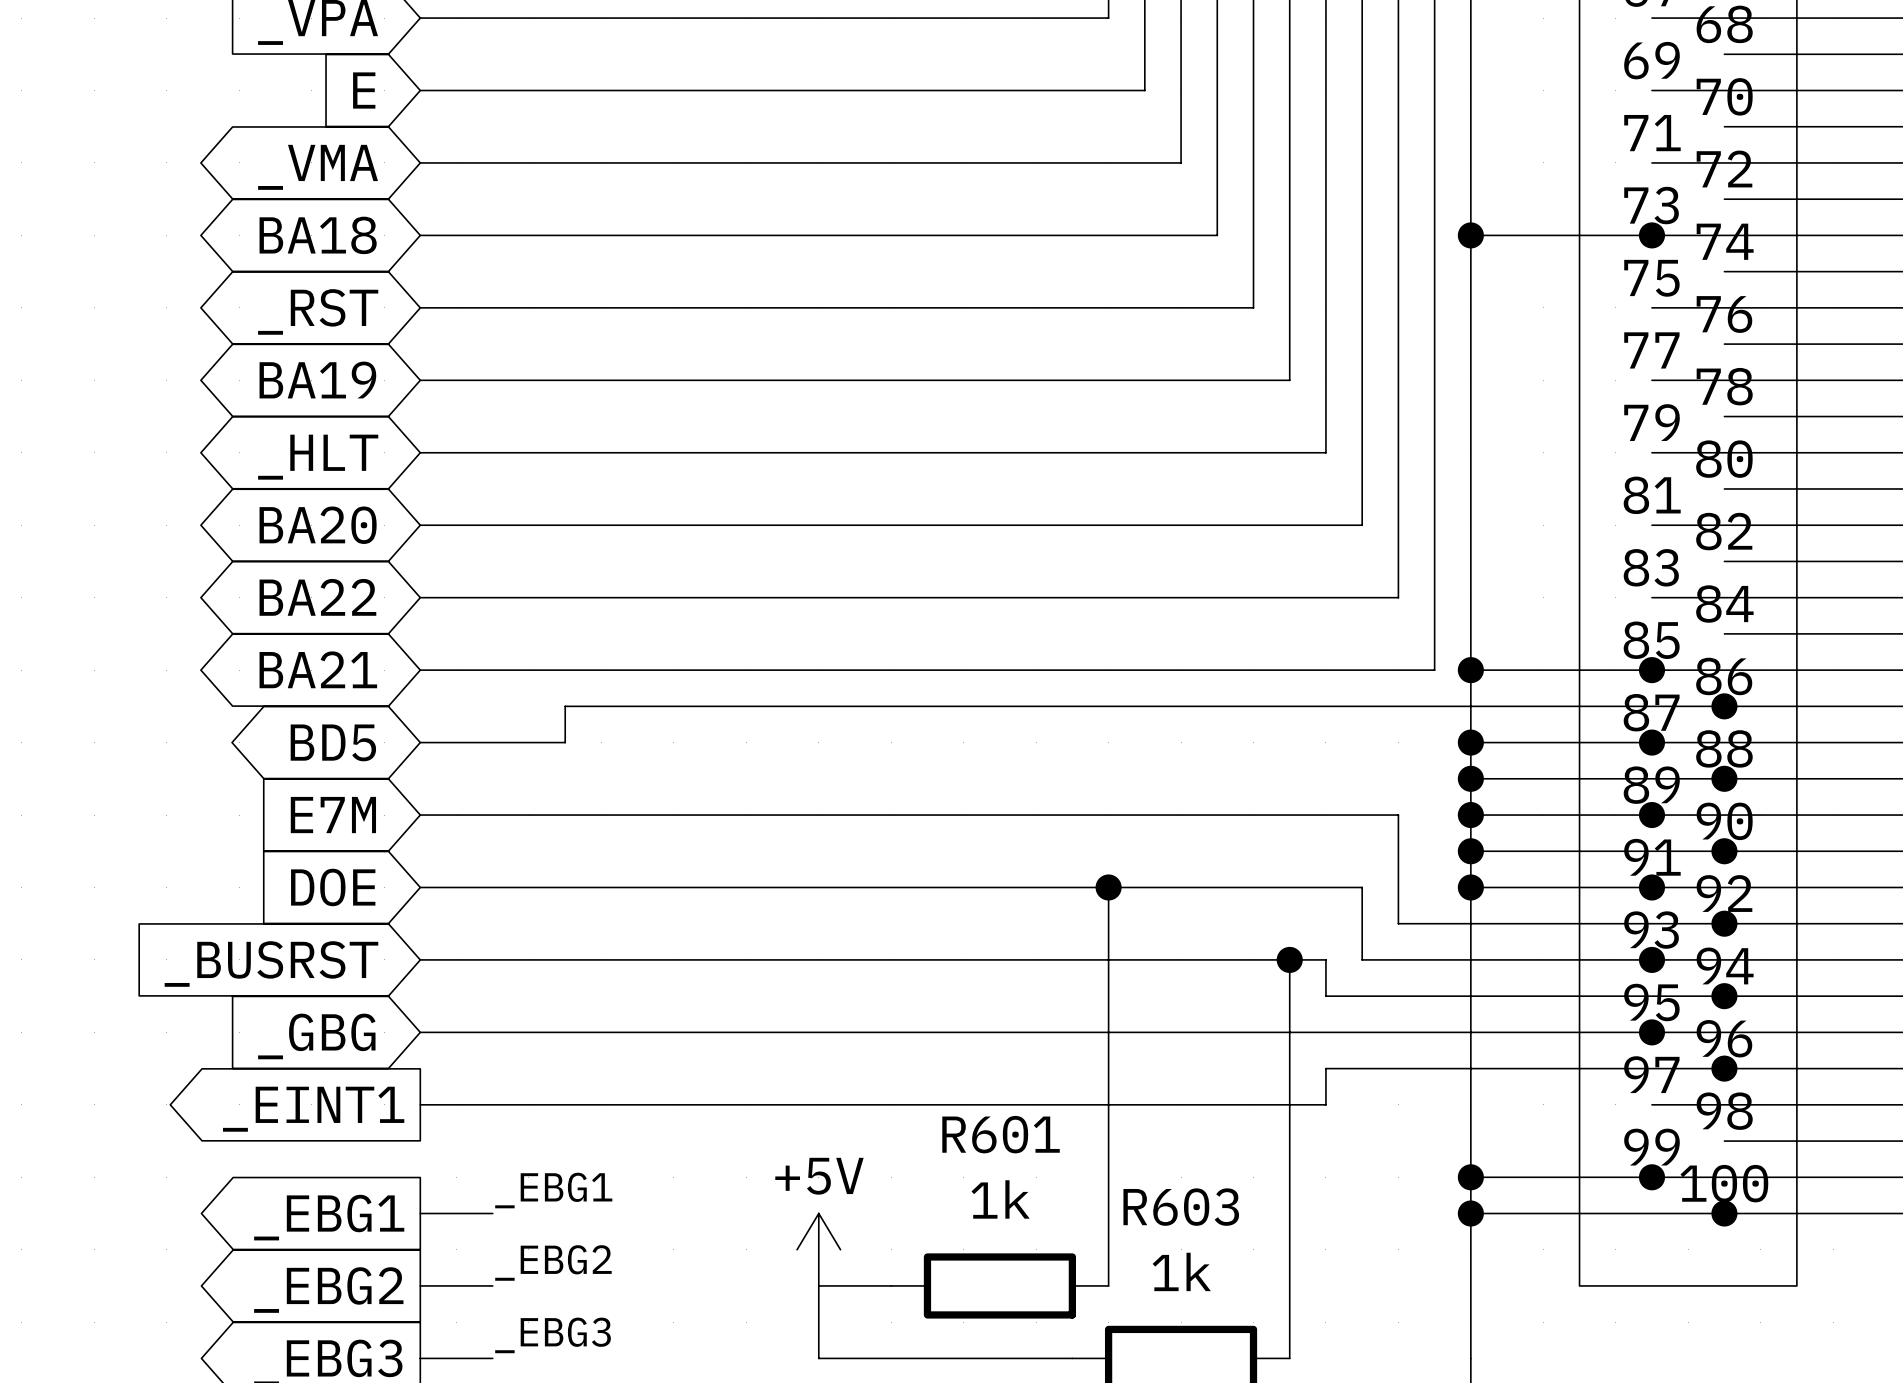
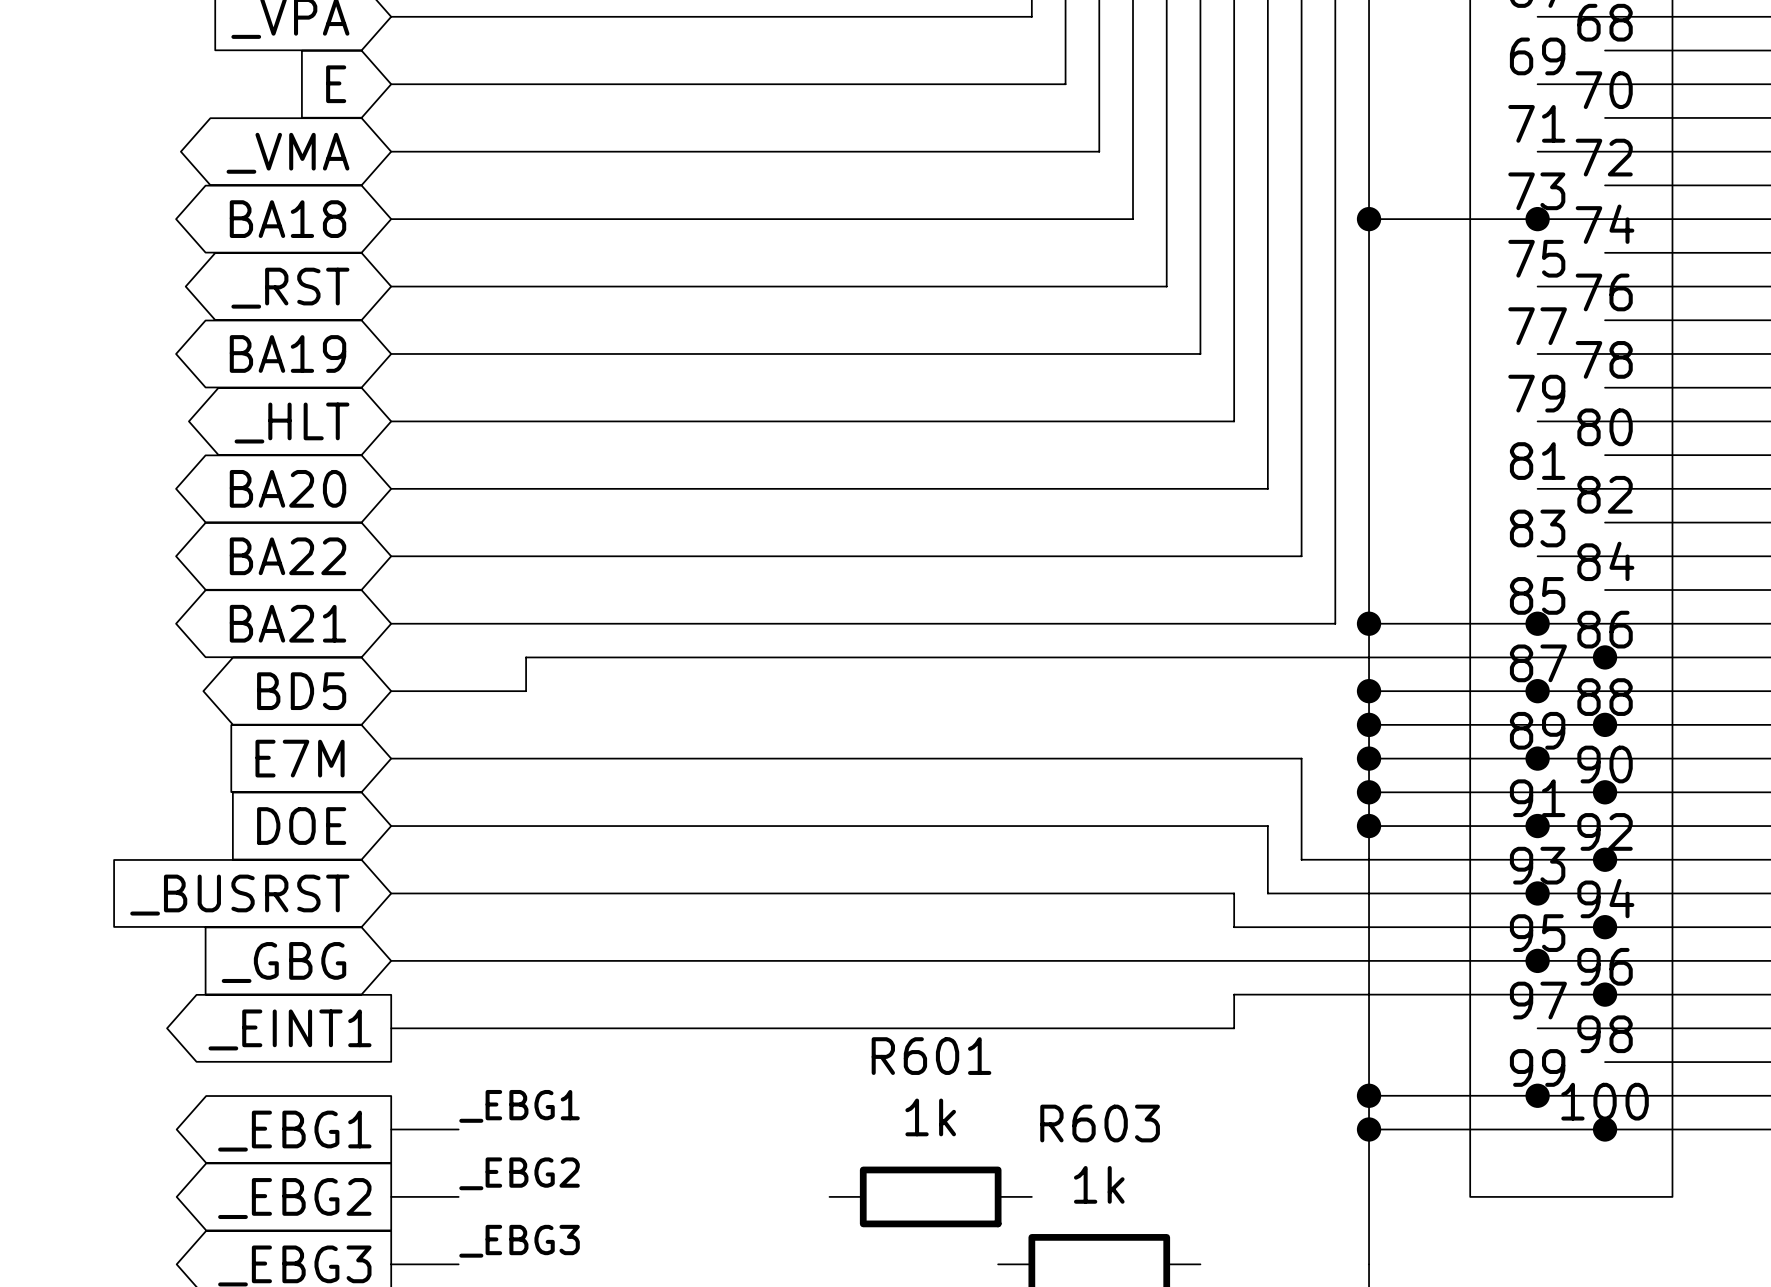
wire: (1108, 887) (1108, 1285) -> none
junction: (1108, 887) -> none
wire: (1289, 959) (1289, 1358) -> none
junction: (1289, 959) -> none
power symbol: +5V (818, 1249) -> none
wire: (891, 1285) (818, 1285) (818, 1358) (1072, 1358) -> none

